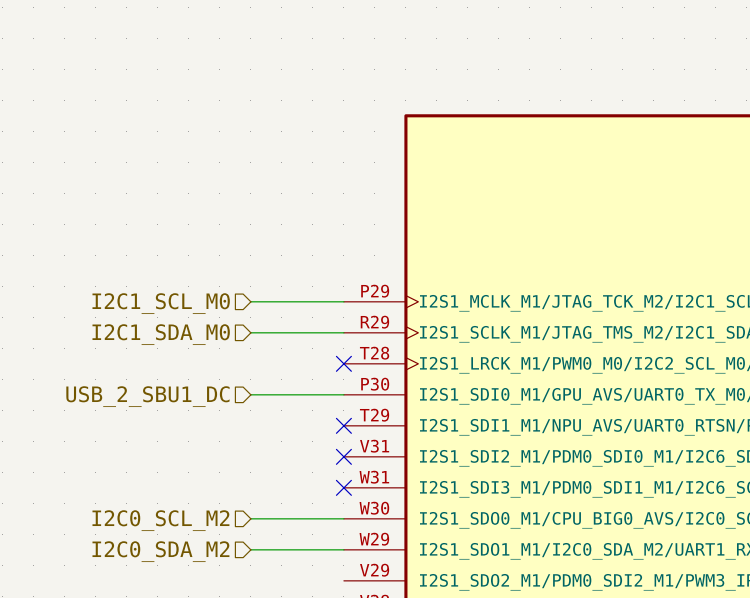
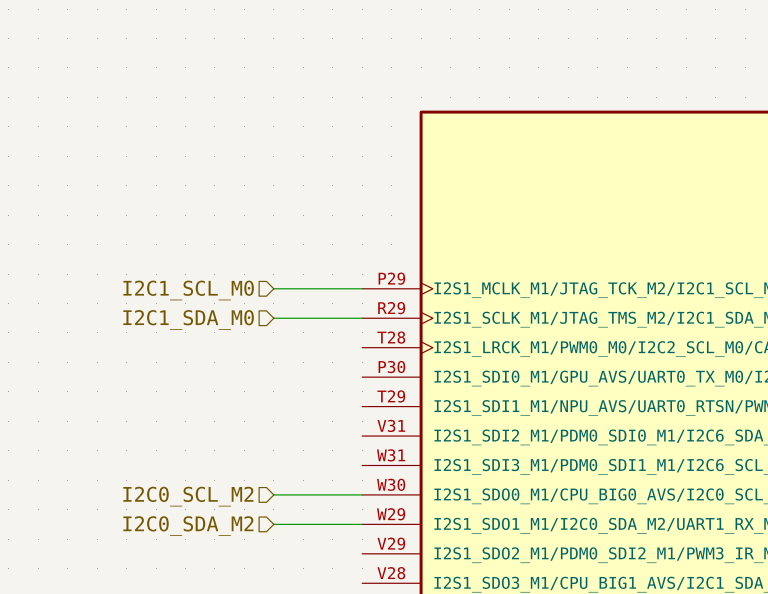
no-connect mark: (343, 363) -> none
wire: (250, 394) (343, 394) -> none
hierarchical label: USB_2_SBU1_DC (147, 396) -> none
no-connect mark: (343, 425) -> none
no-connect mark: (343, 456) -> none
no-connect mark: (343, 487) -> none

